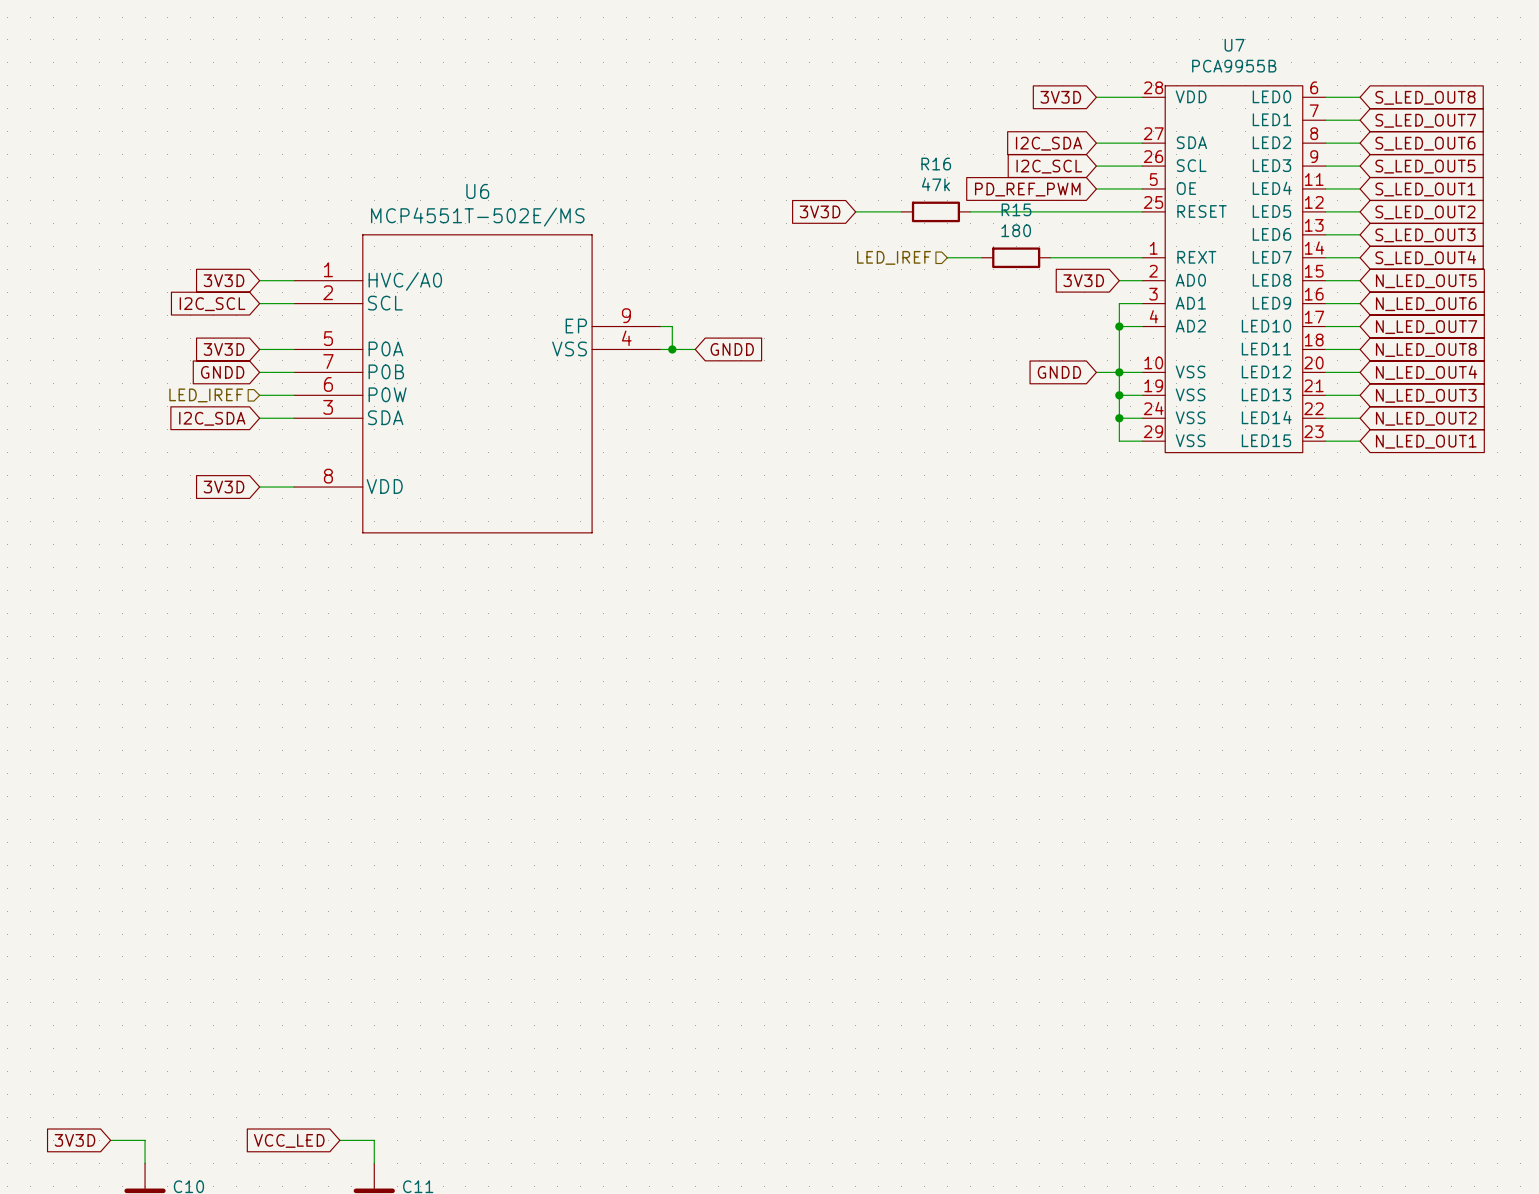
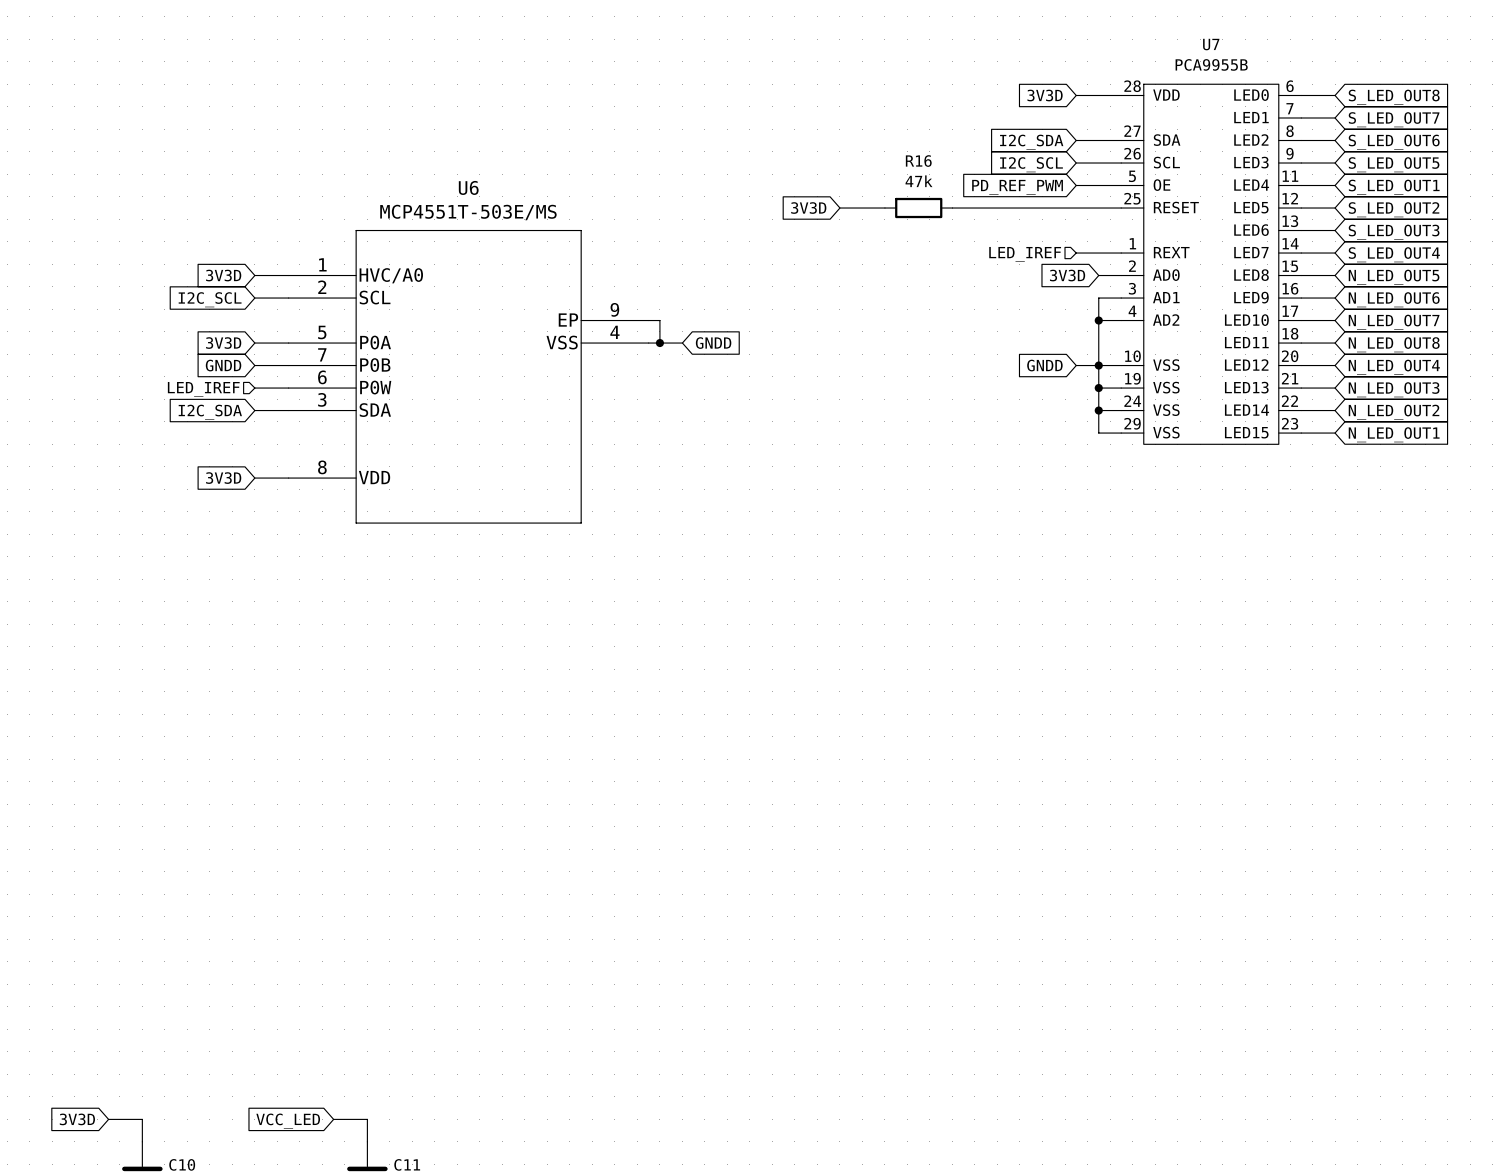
U6 value: MCP4551T-502E/MS (477, 217) -> MCP4551T-503E/MS (468, 212)
hierarchical label position: LED_IREF (894, 257) -> LED_IREF (1025, 254)
wire: (947, 257) (981, 257) -> none
R15: 180 (1016, 257) -> none
wire: (1050, 257) (1096, 257) -> none

